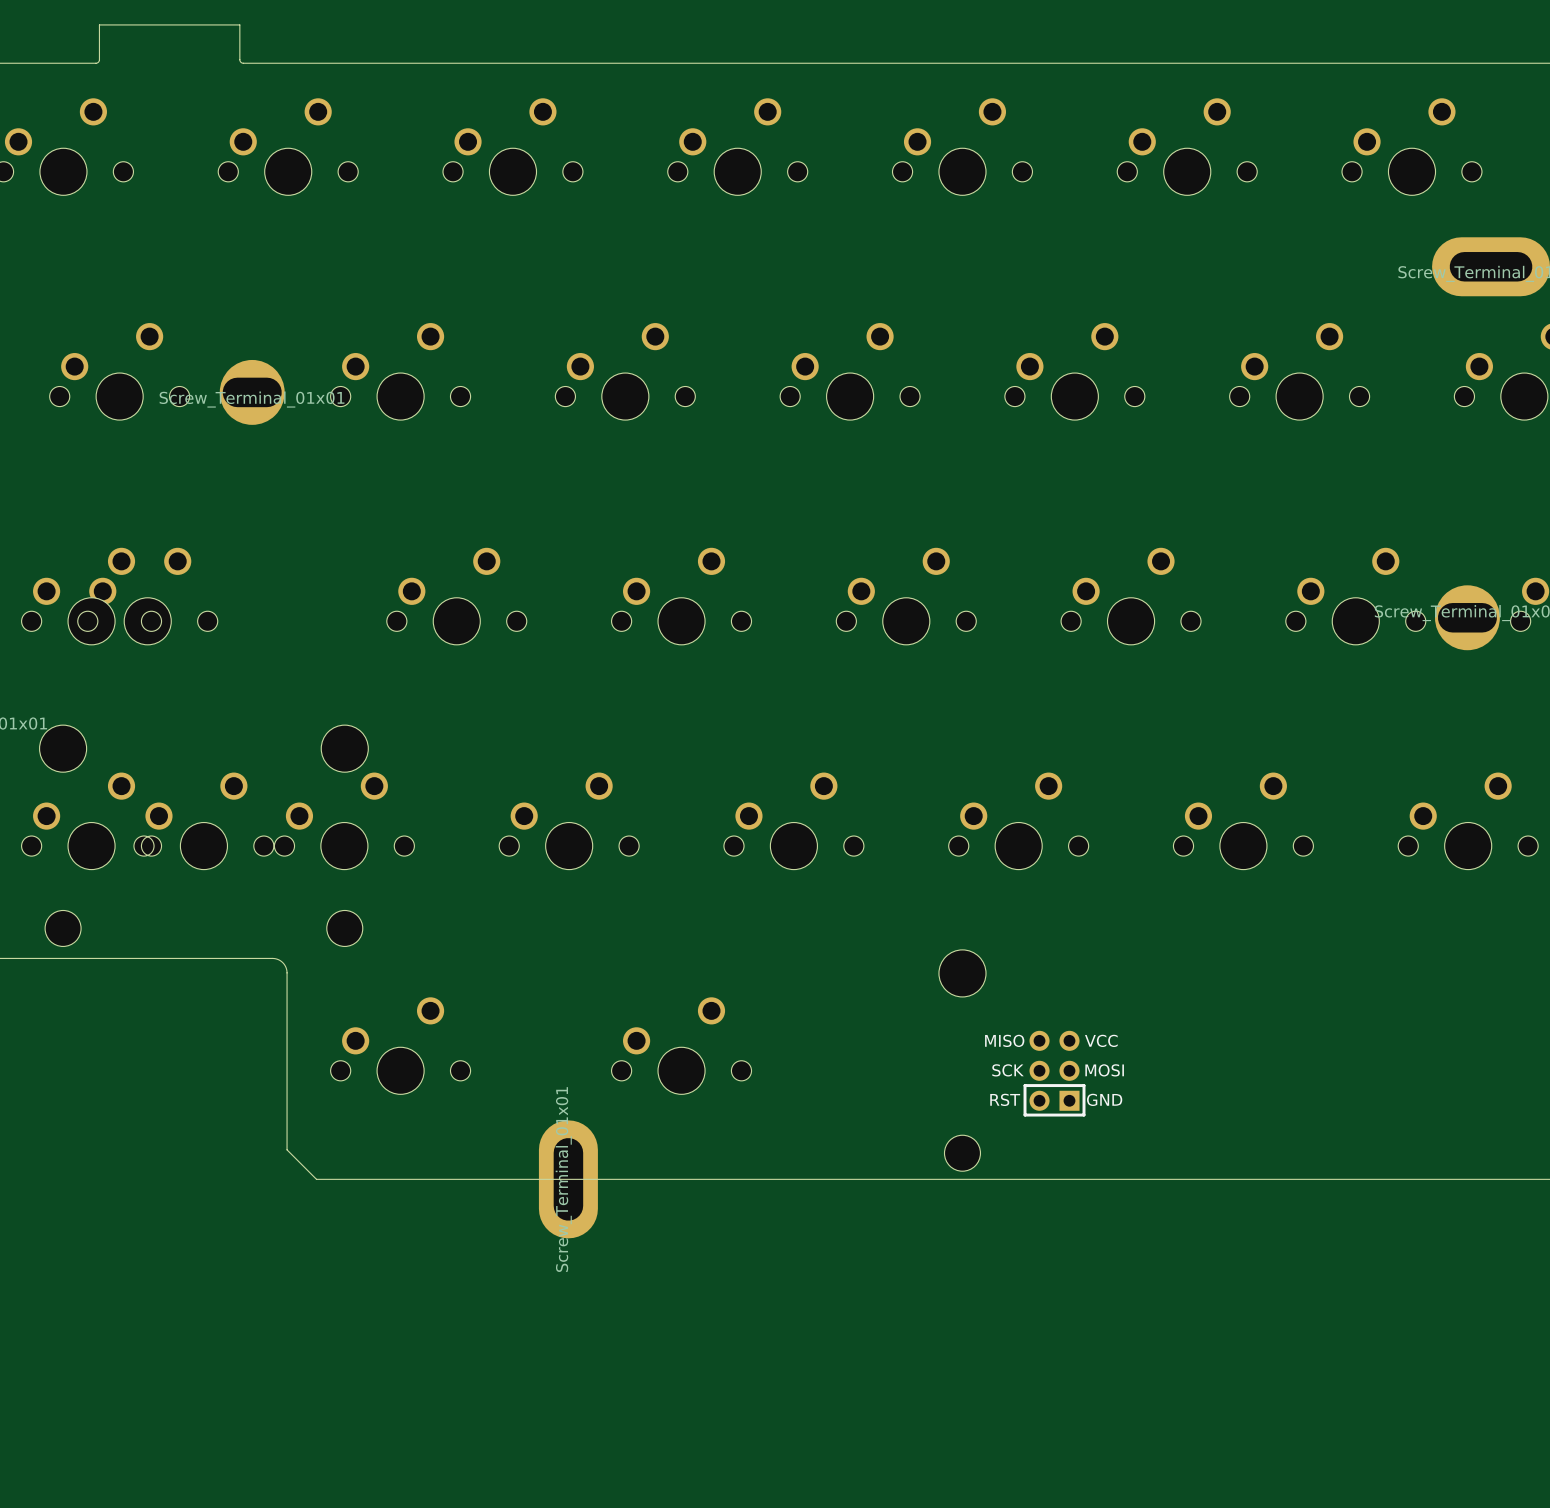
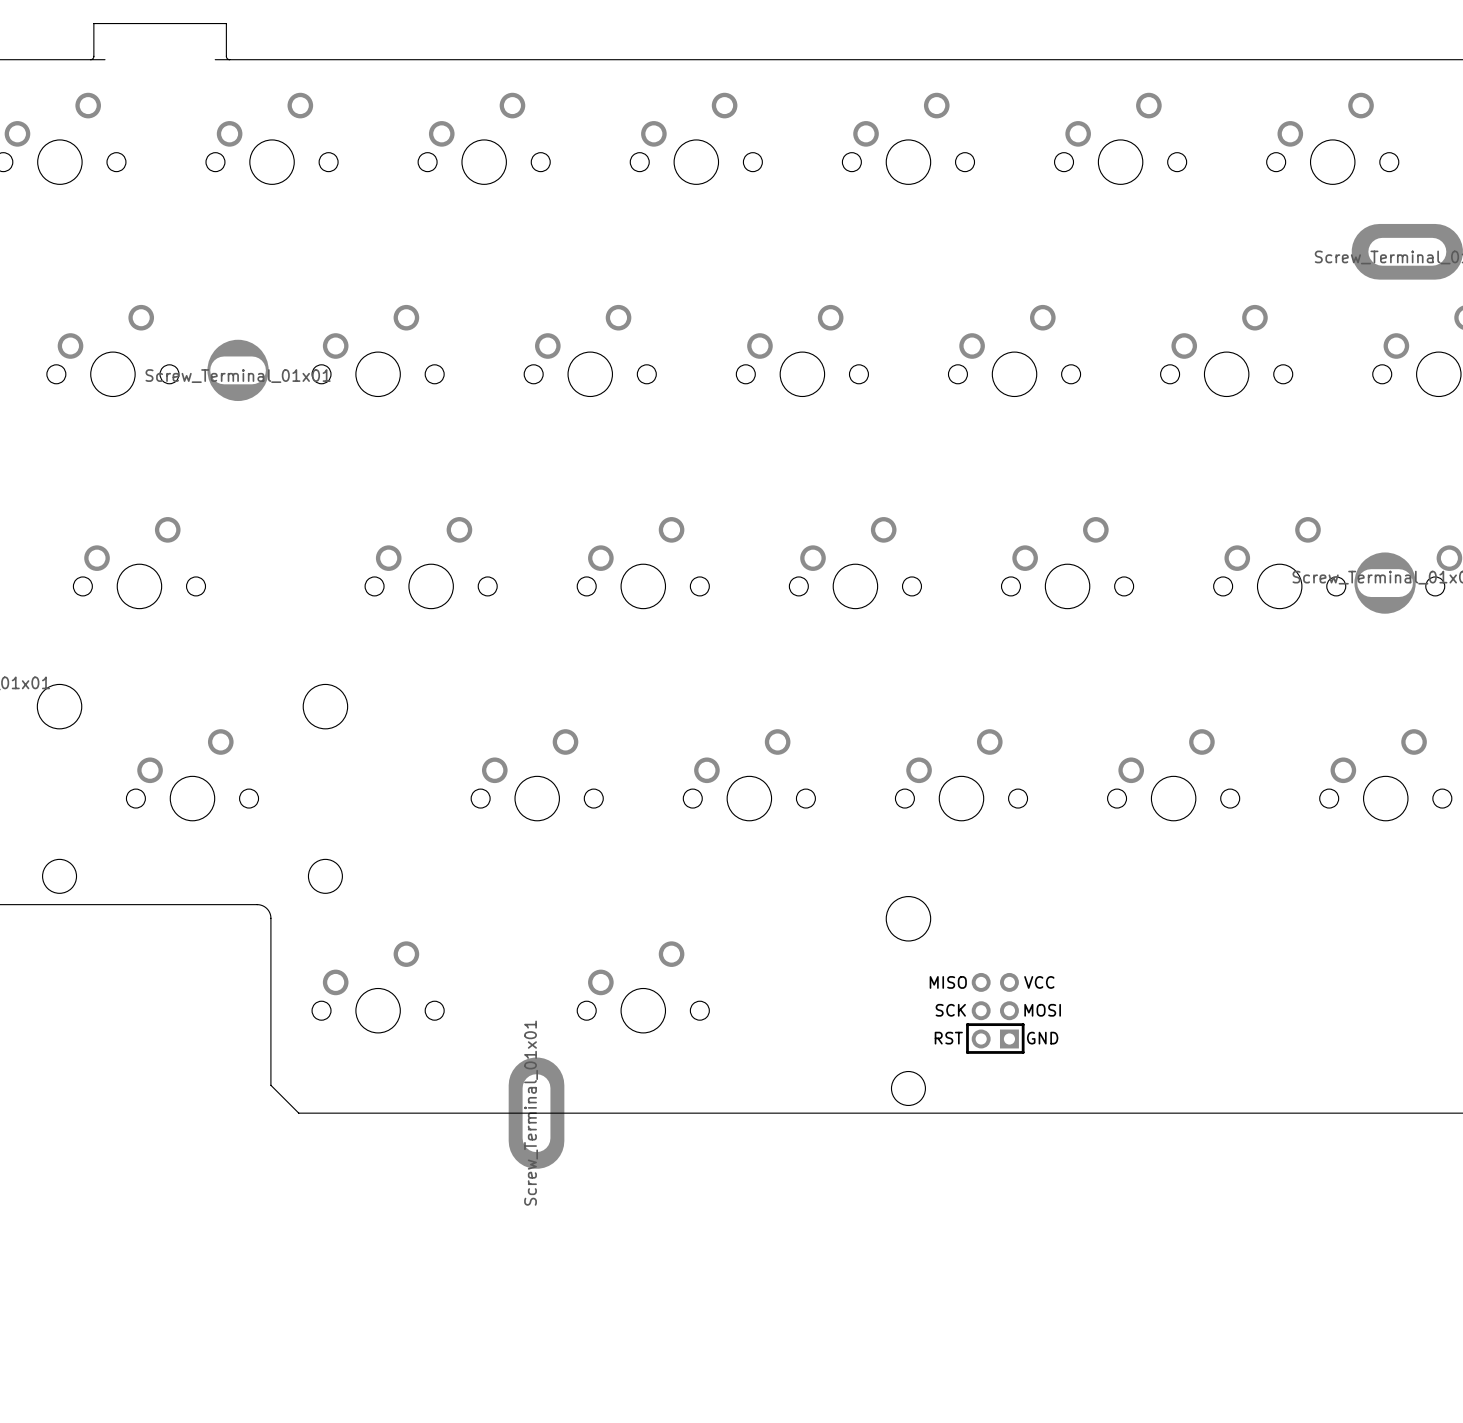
board edge: none -> (90, 59) (105, 59)
board edge: none -> (215, 59) (229, 59)
part: (91, 596) -> none
part: (91, 821) -> none
part: (344, 821) -> none

